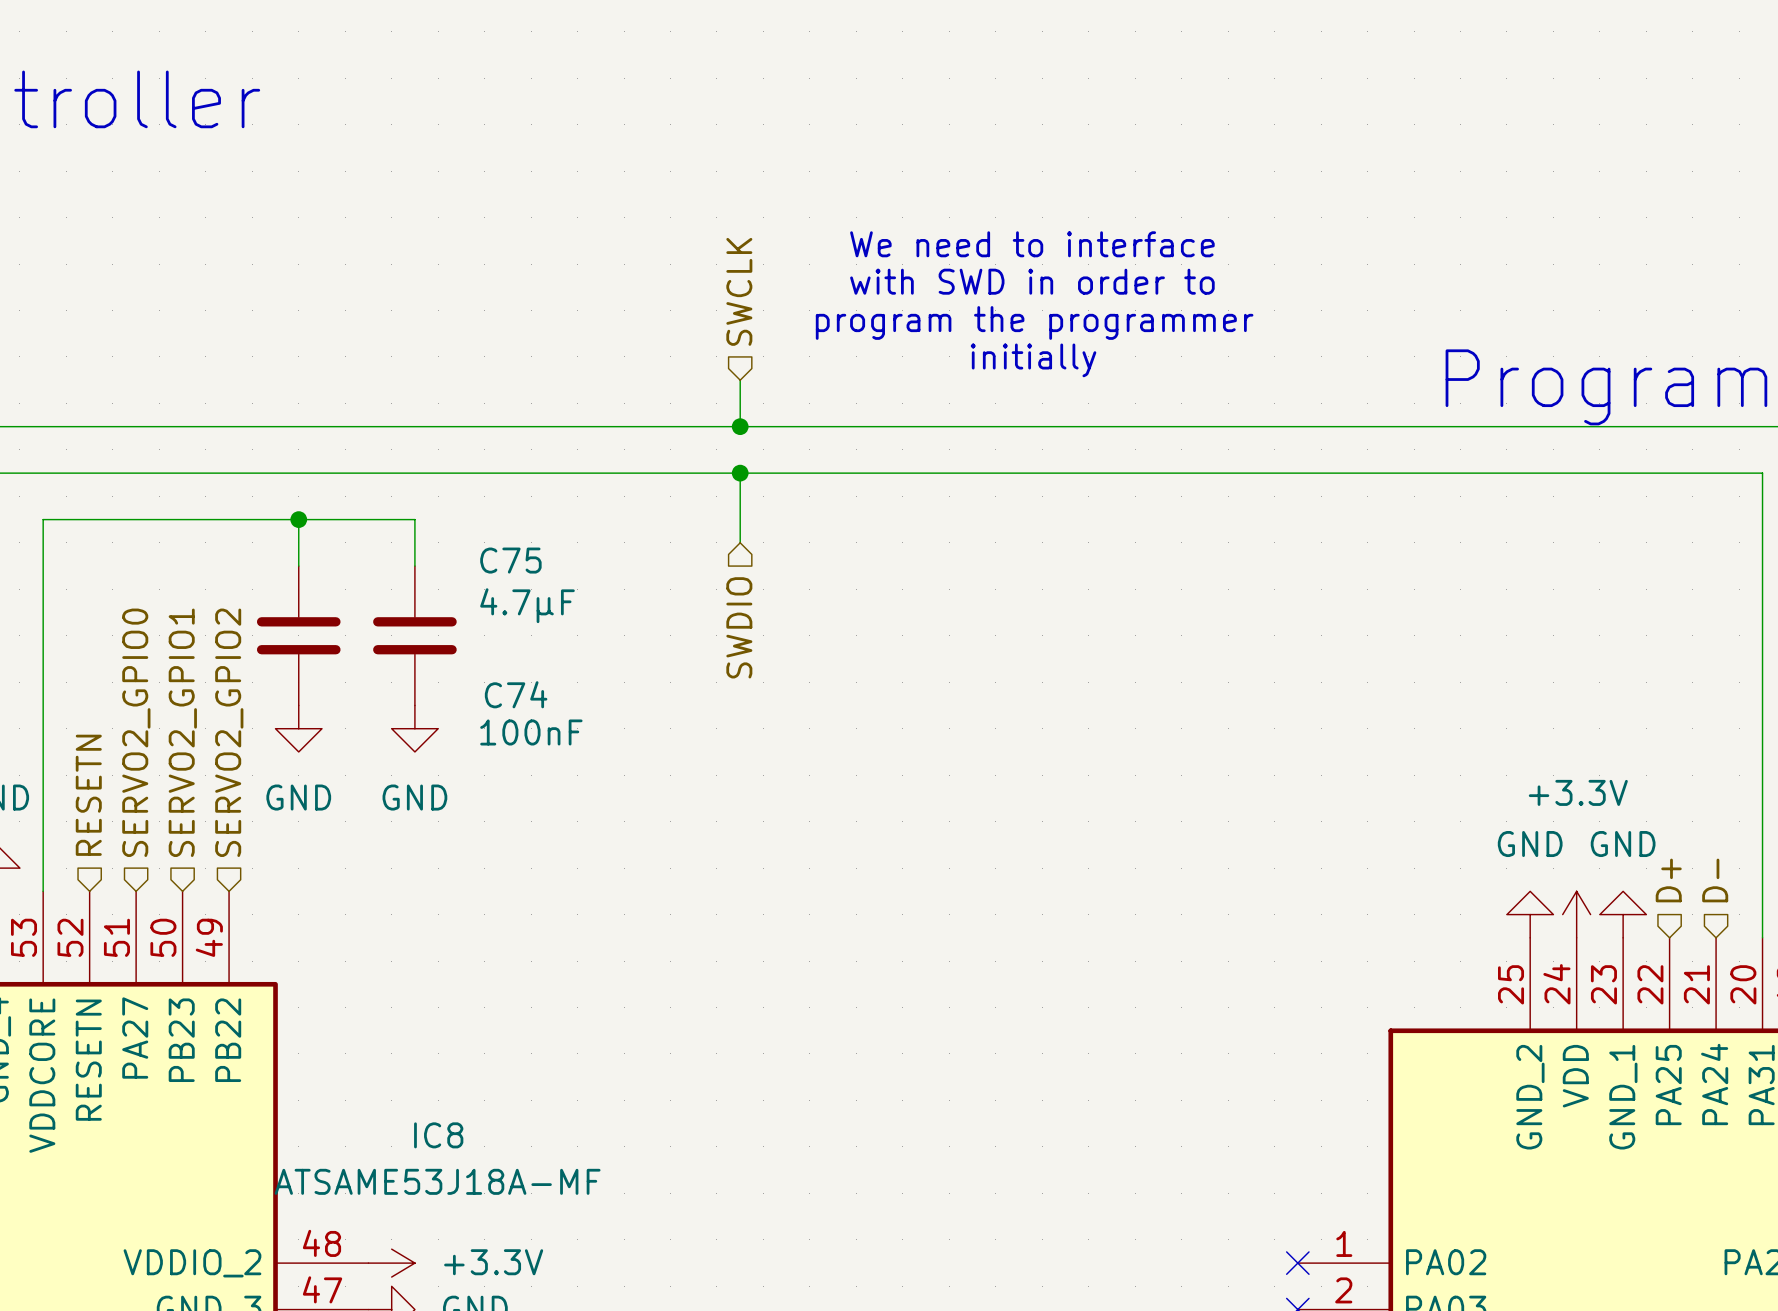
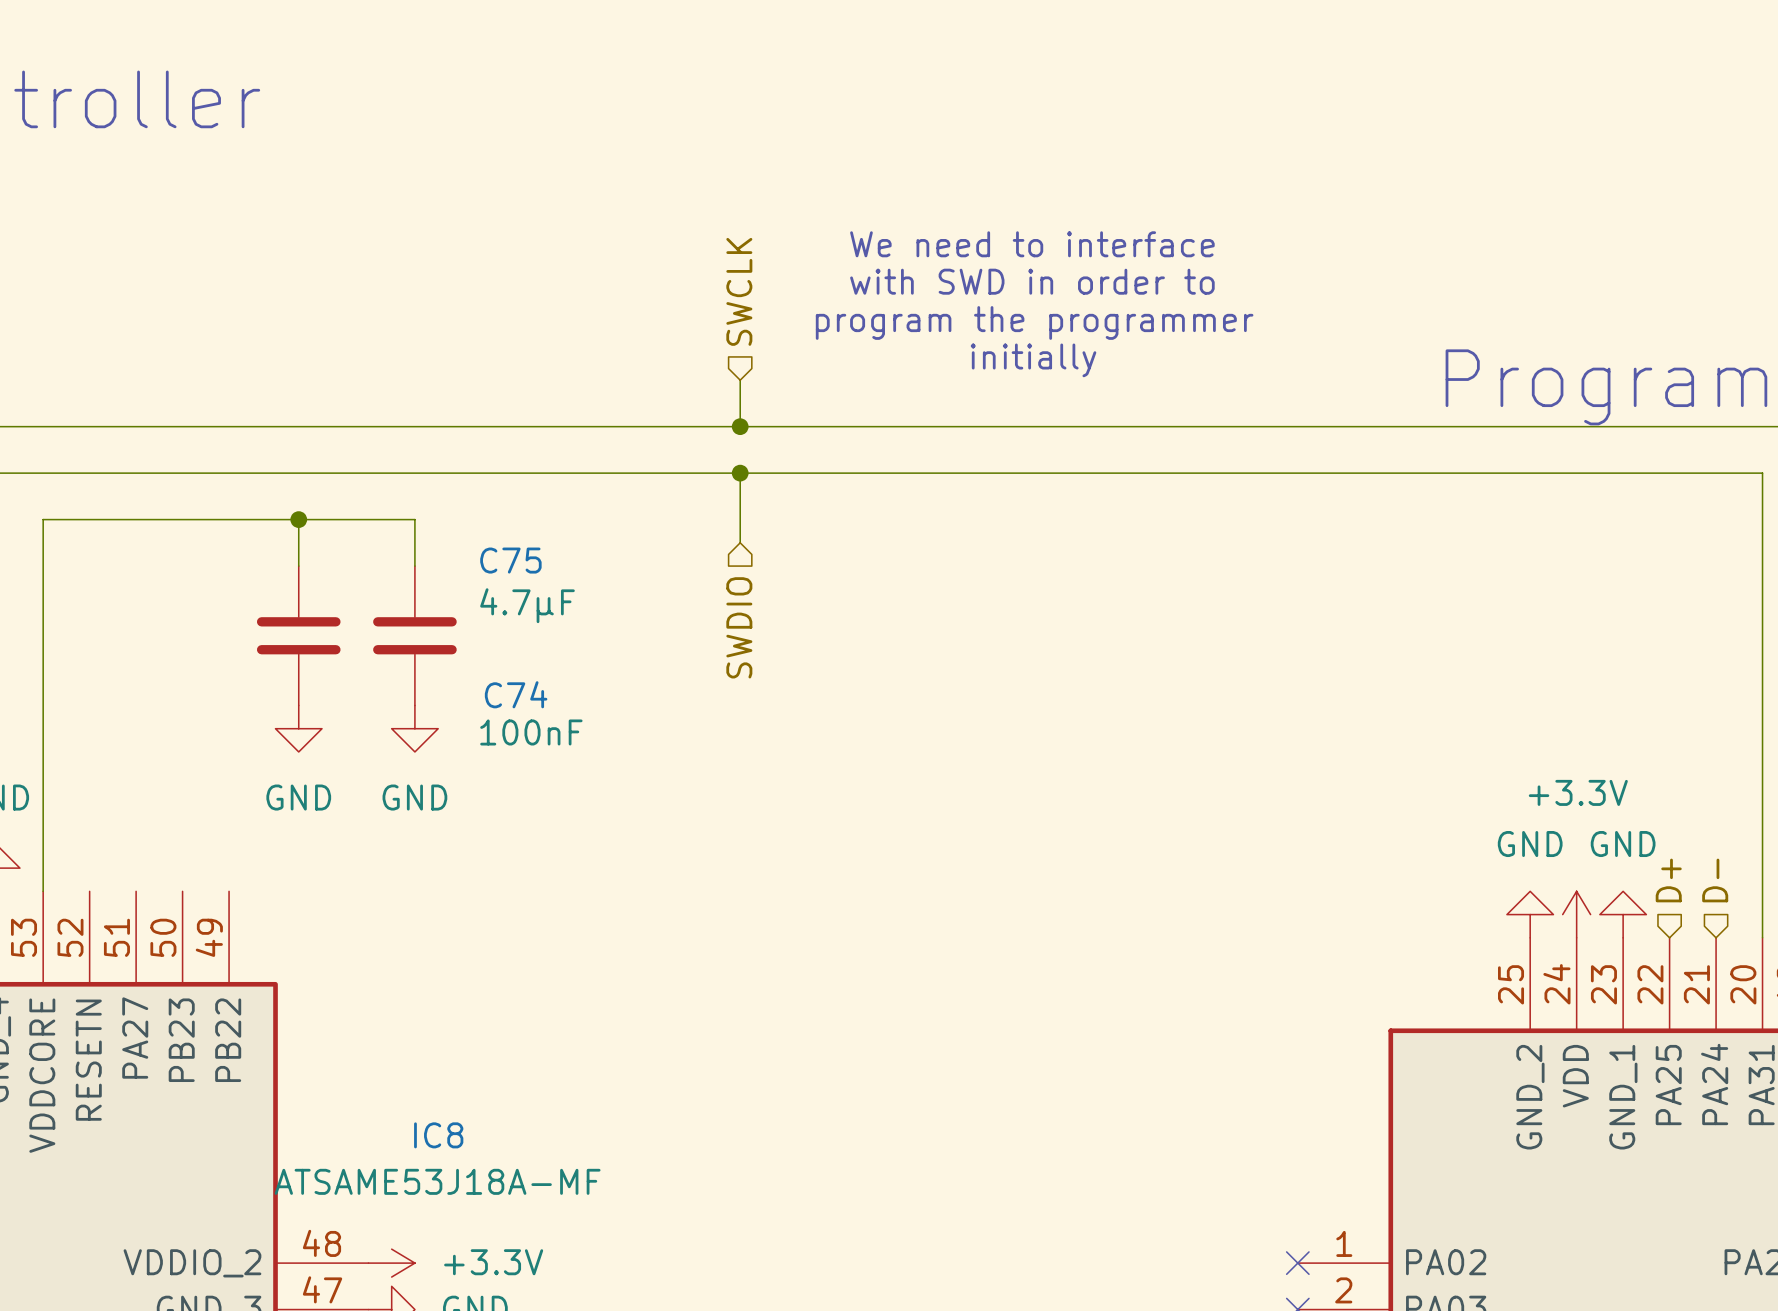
hierarchical label: SERVO2_GPIO0 (136, 732) -> none
hierarchical label: SERVO2_GPIO1 (182, 732) -> none
hierarchical label: SERVO2_GPIO2 (229, 732) -> none
hierarchical label: RESETN (88, 795) -> none

